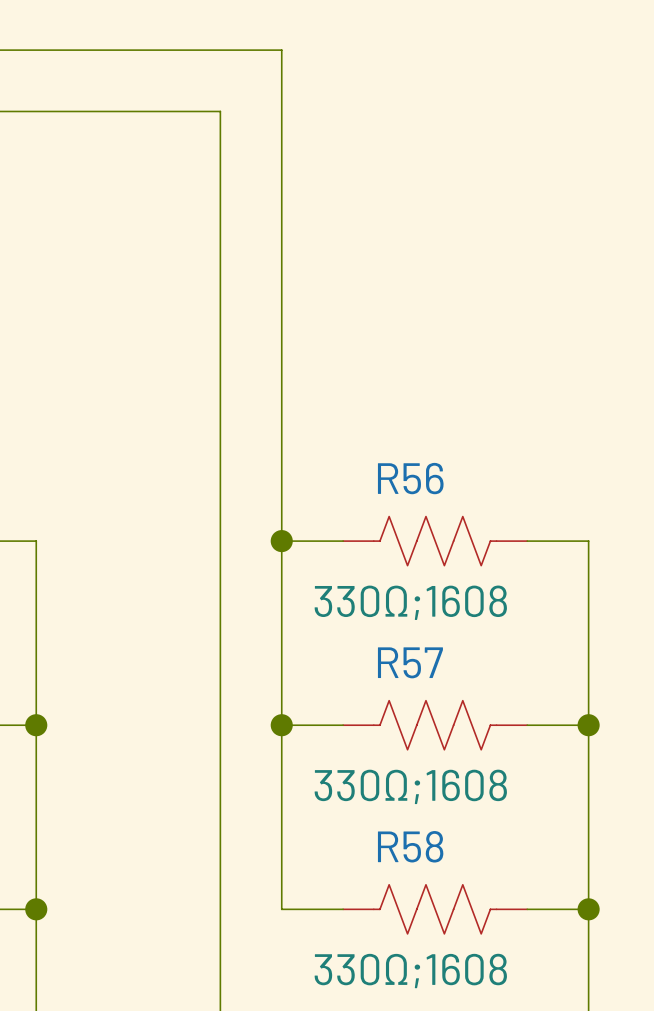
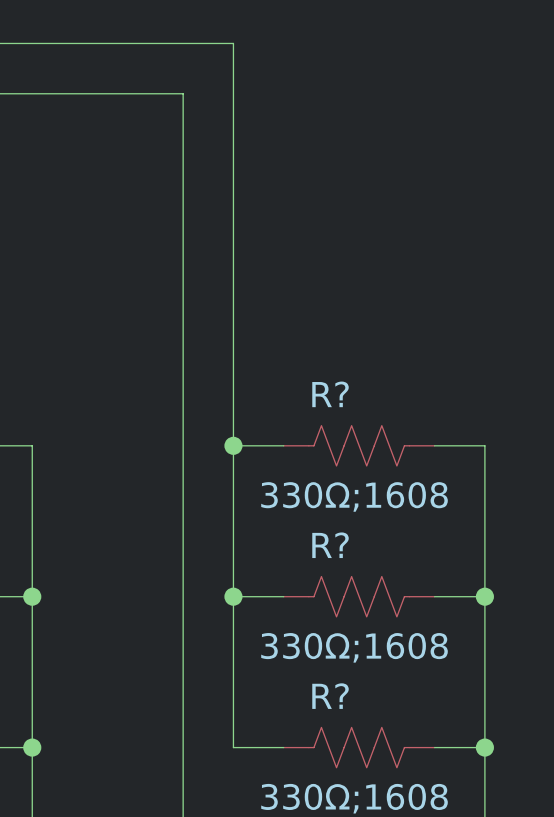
R56 name: R56 (410, 478) -> R? (330, 394)
R57 name: R57 (410, 662) -> R? (330, 545)
R58 name: R58 (410, 846) -> R? (330, 696)

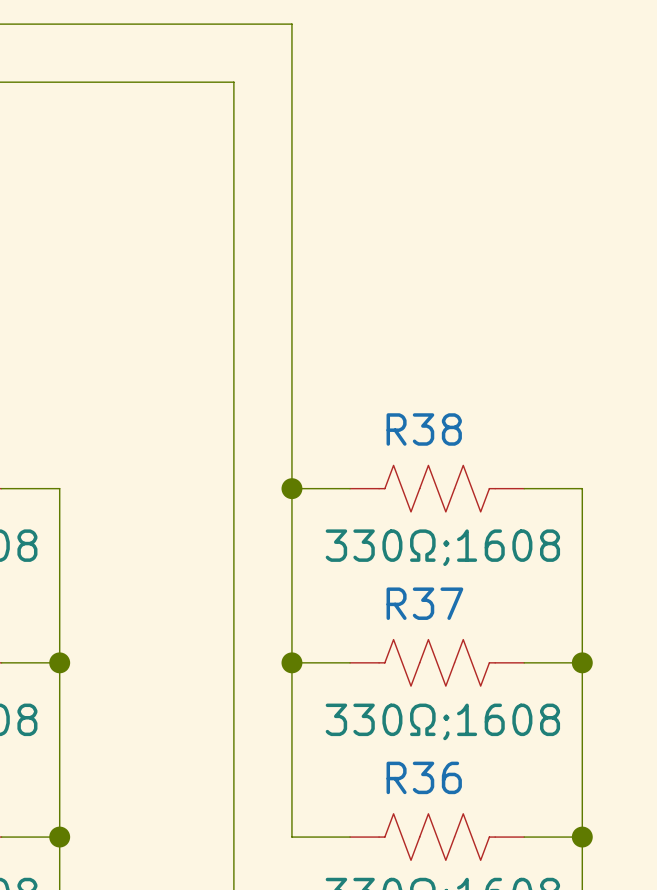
R? name: R? (330, 394) -> R38 (424, 429)
R? name: R? (330, 545) -> R37 (424, 603)
R? name: R? (330, 696) -> R36 (424, 777)

